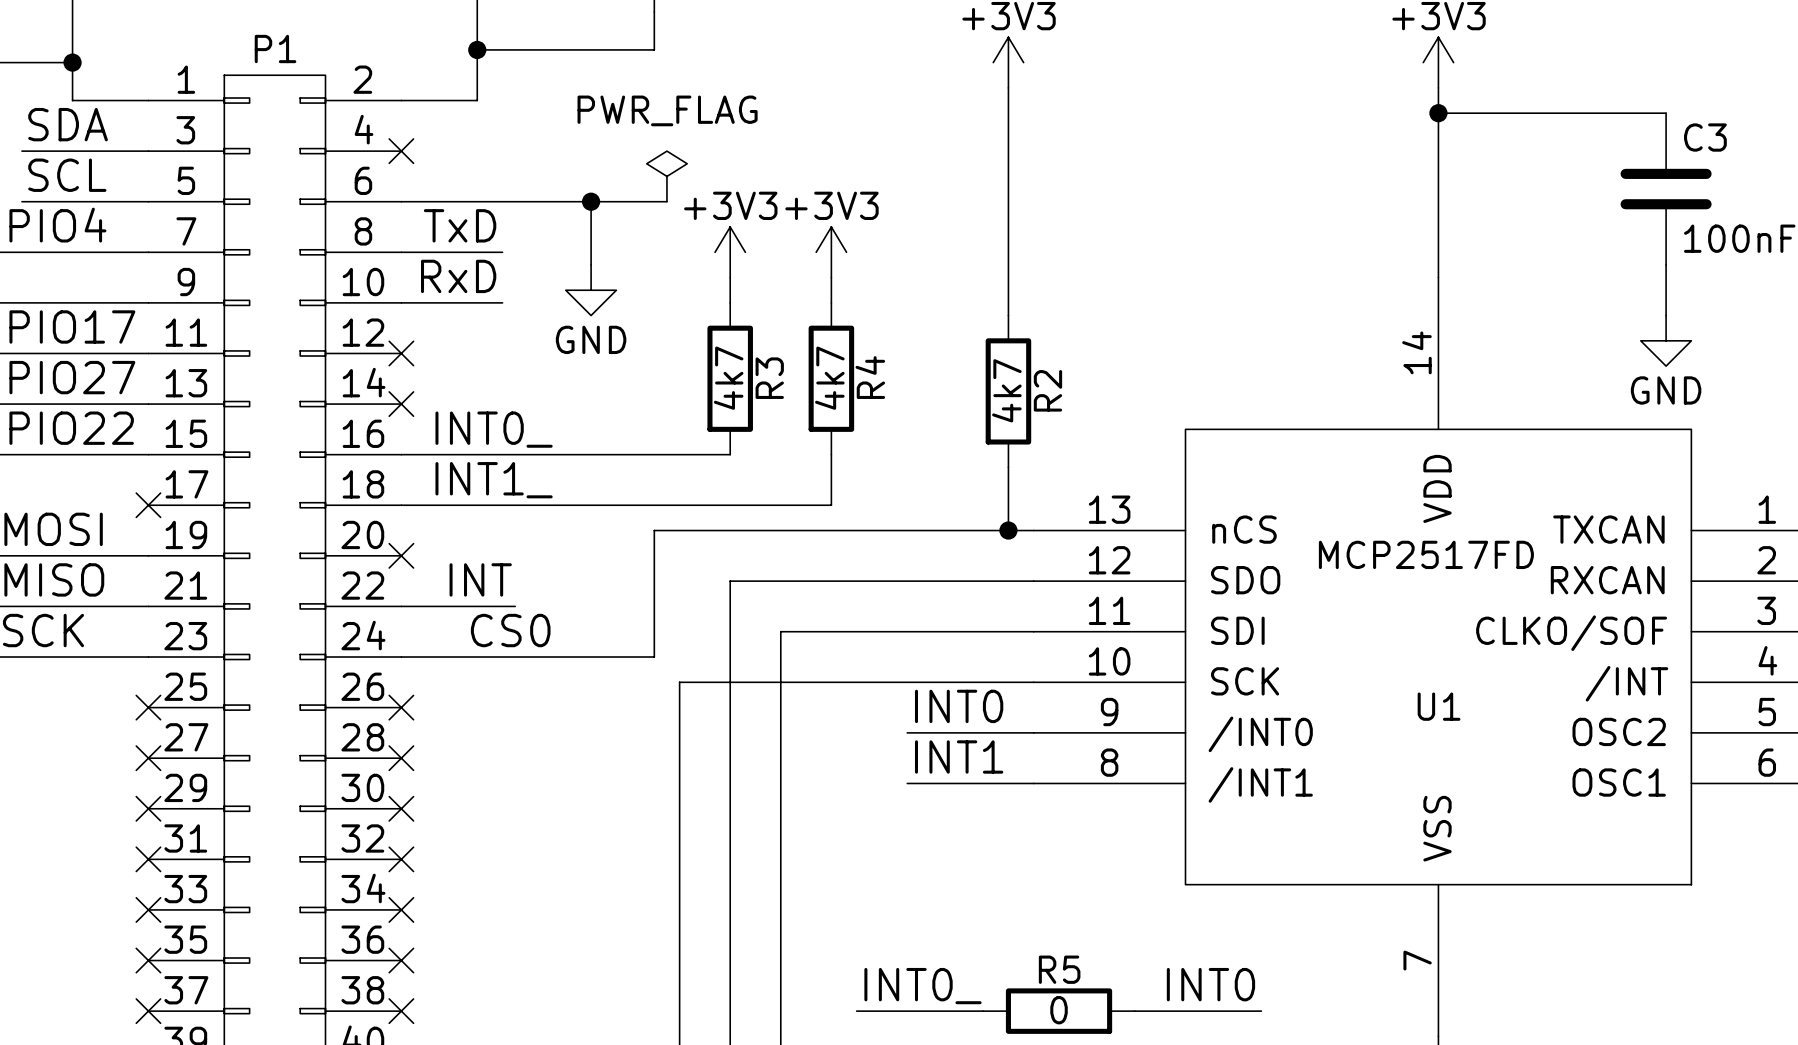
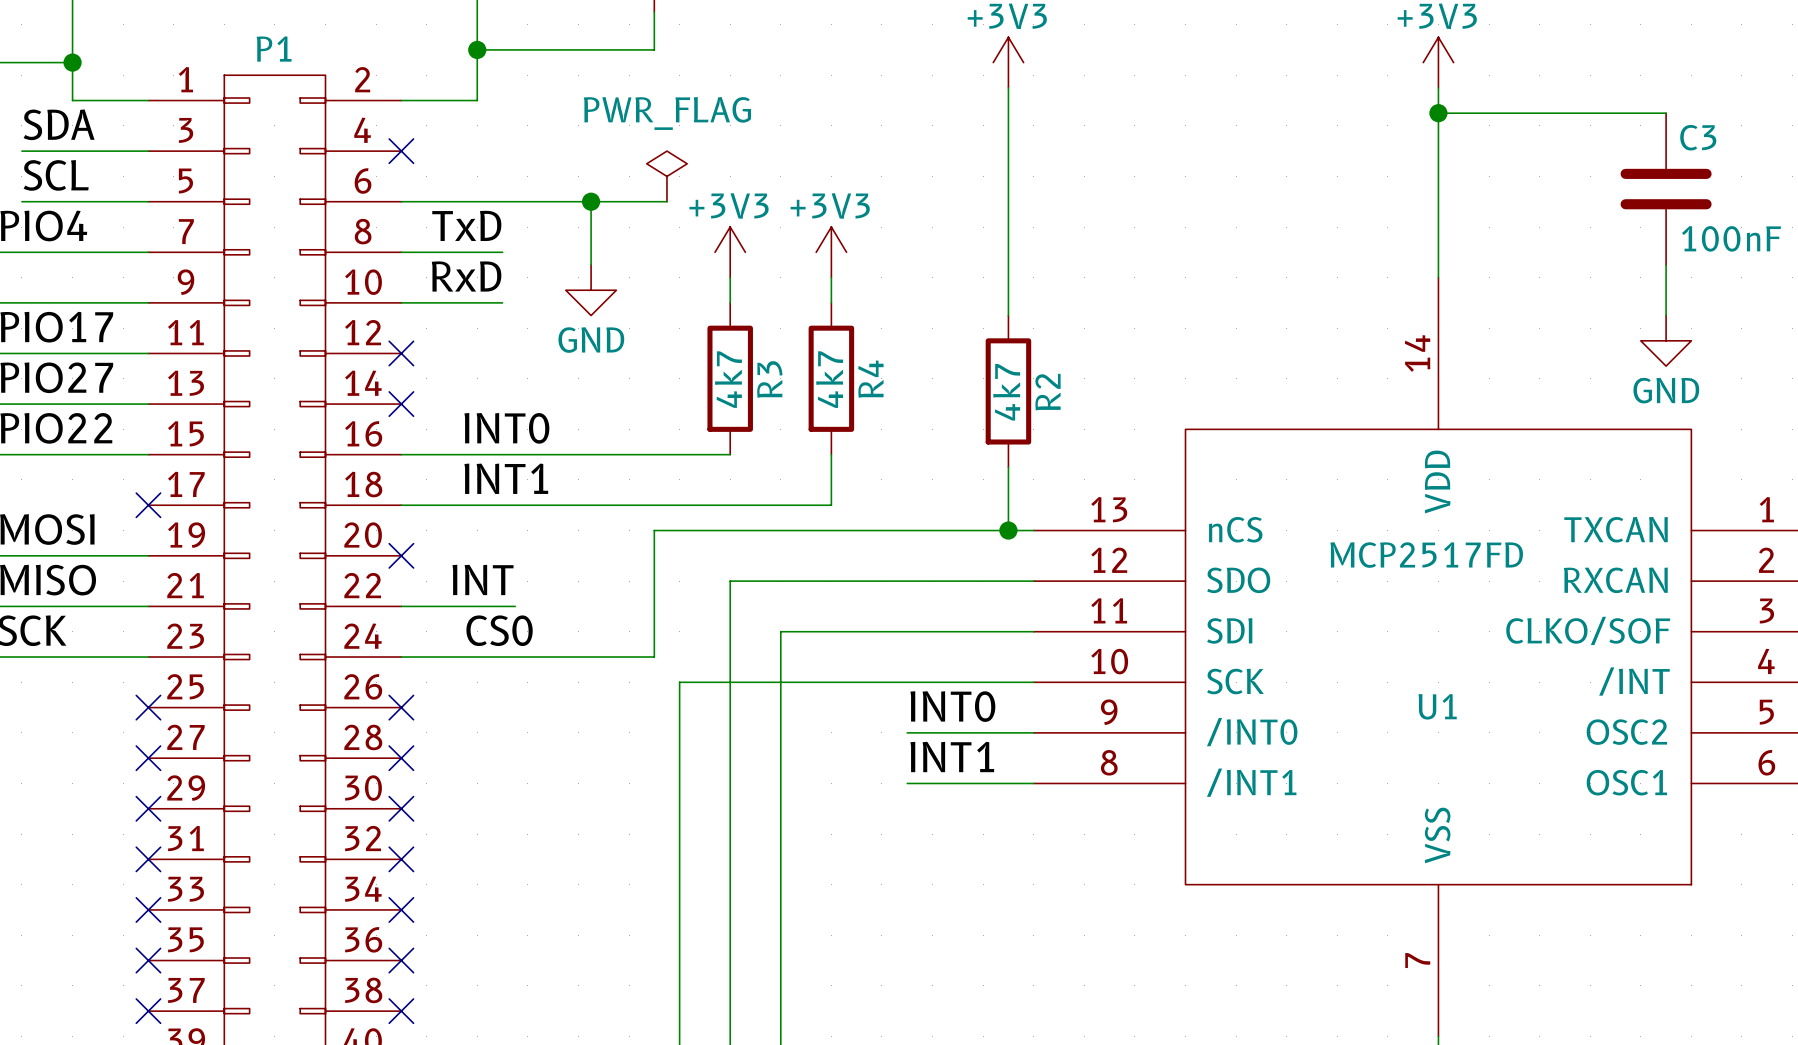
label: INT0_ (494, 429) -> INT0 (506, 428)
label: INT1_ (494, 480) -> INT1 (506, 478)
label: INT0 (1210, 984) -> none
label: INT0_ (922, 986) -> none
wire: (856, 1011) (983, 1011) -> none
R5: 0 (1059, 1011) -> none
wire: (1134, 1011) (1261, 1011) -> none

